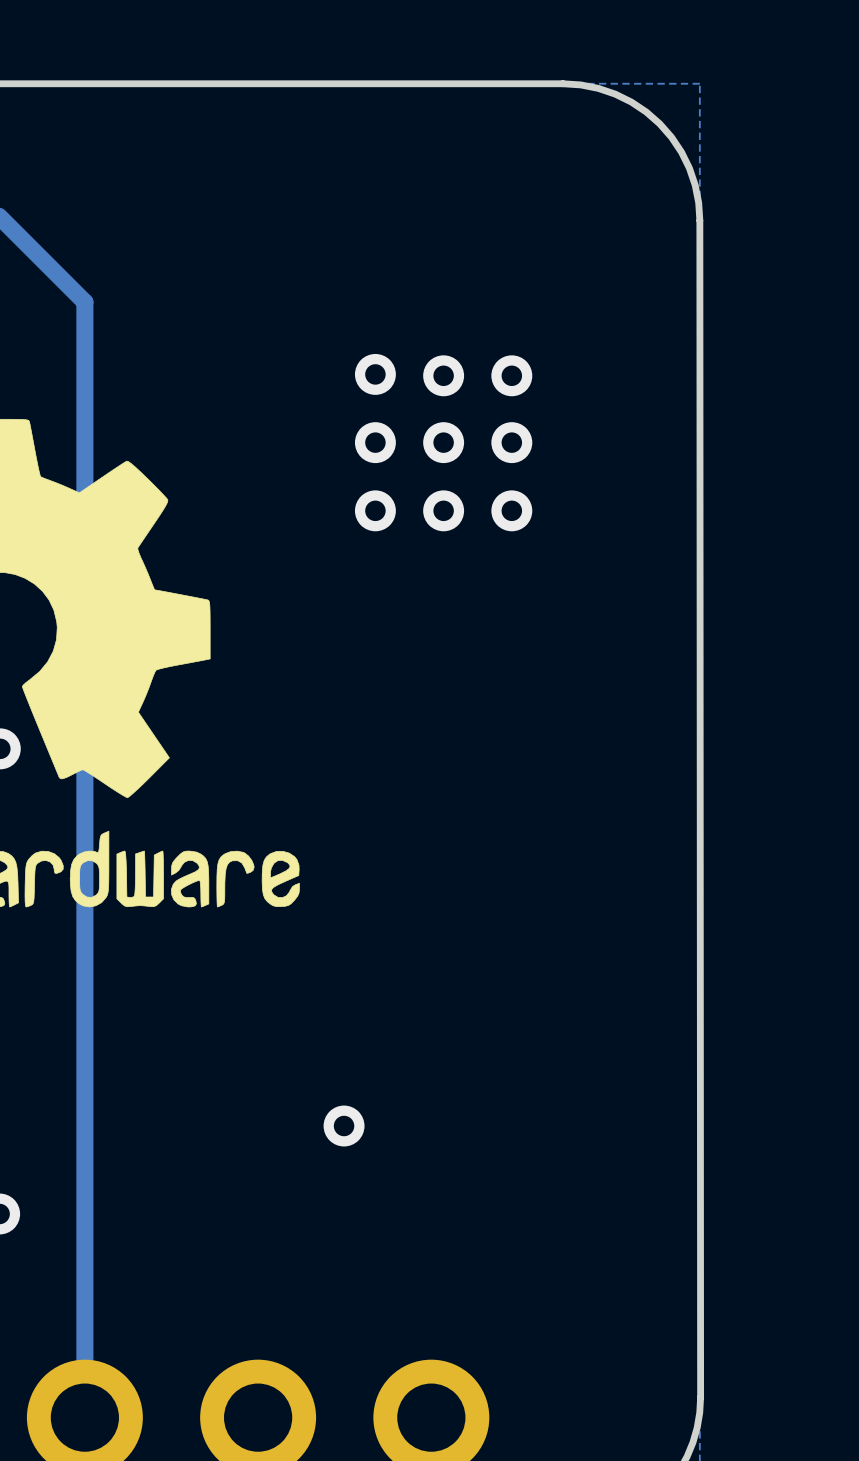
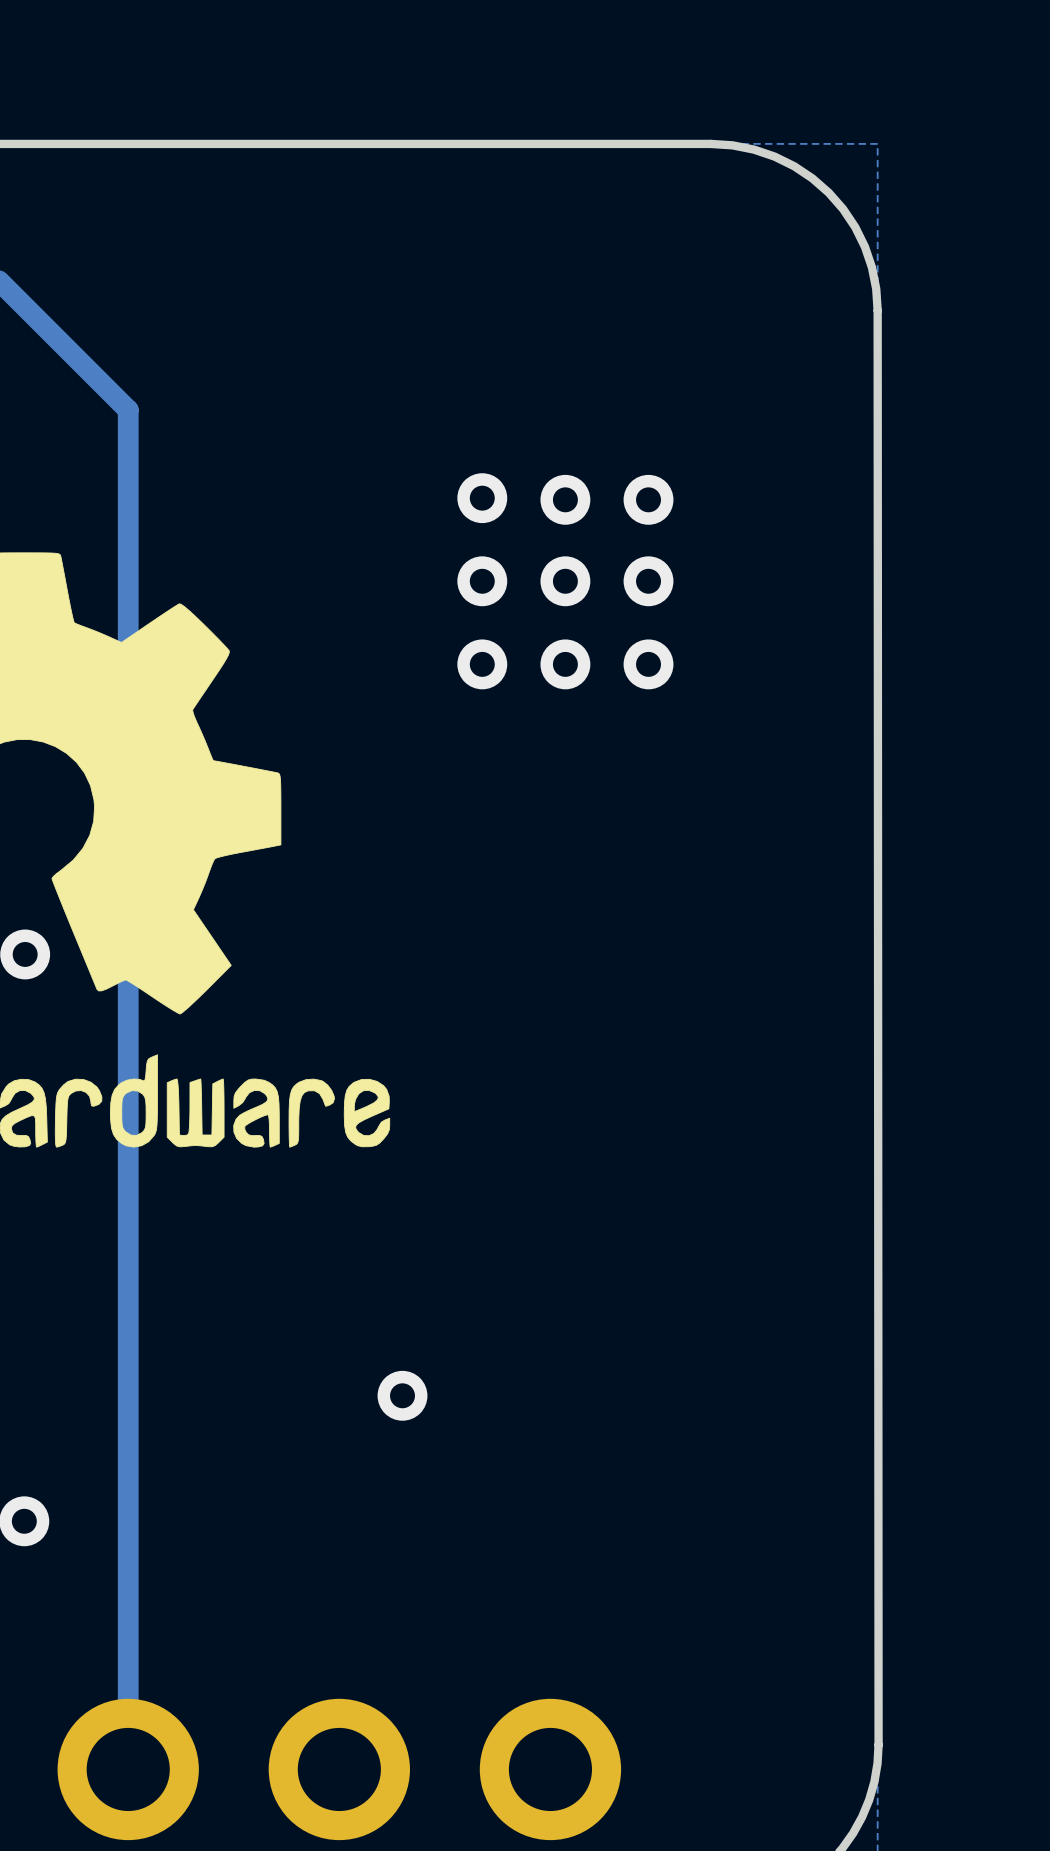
via position: (344, 1126) -> (402, 1395)

